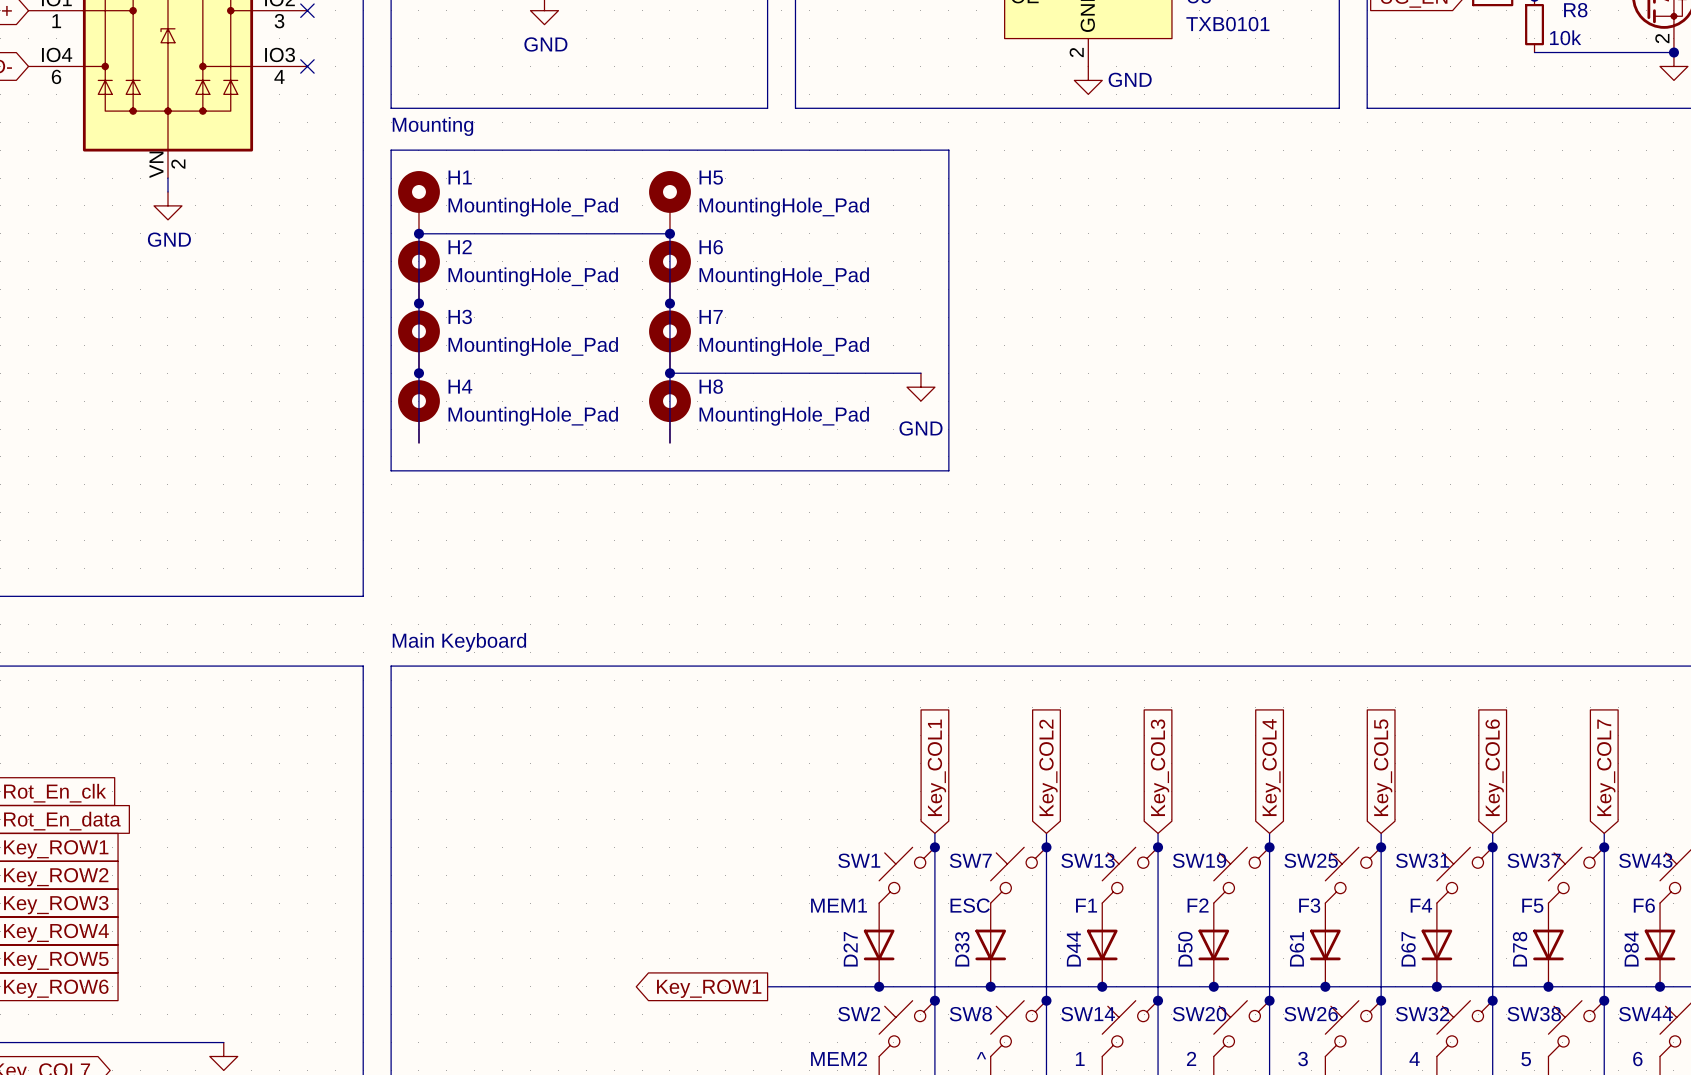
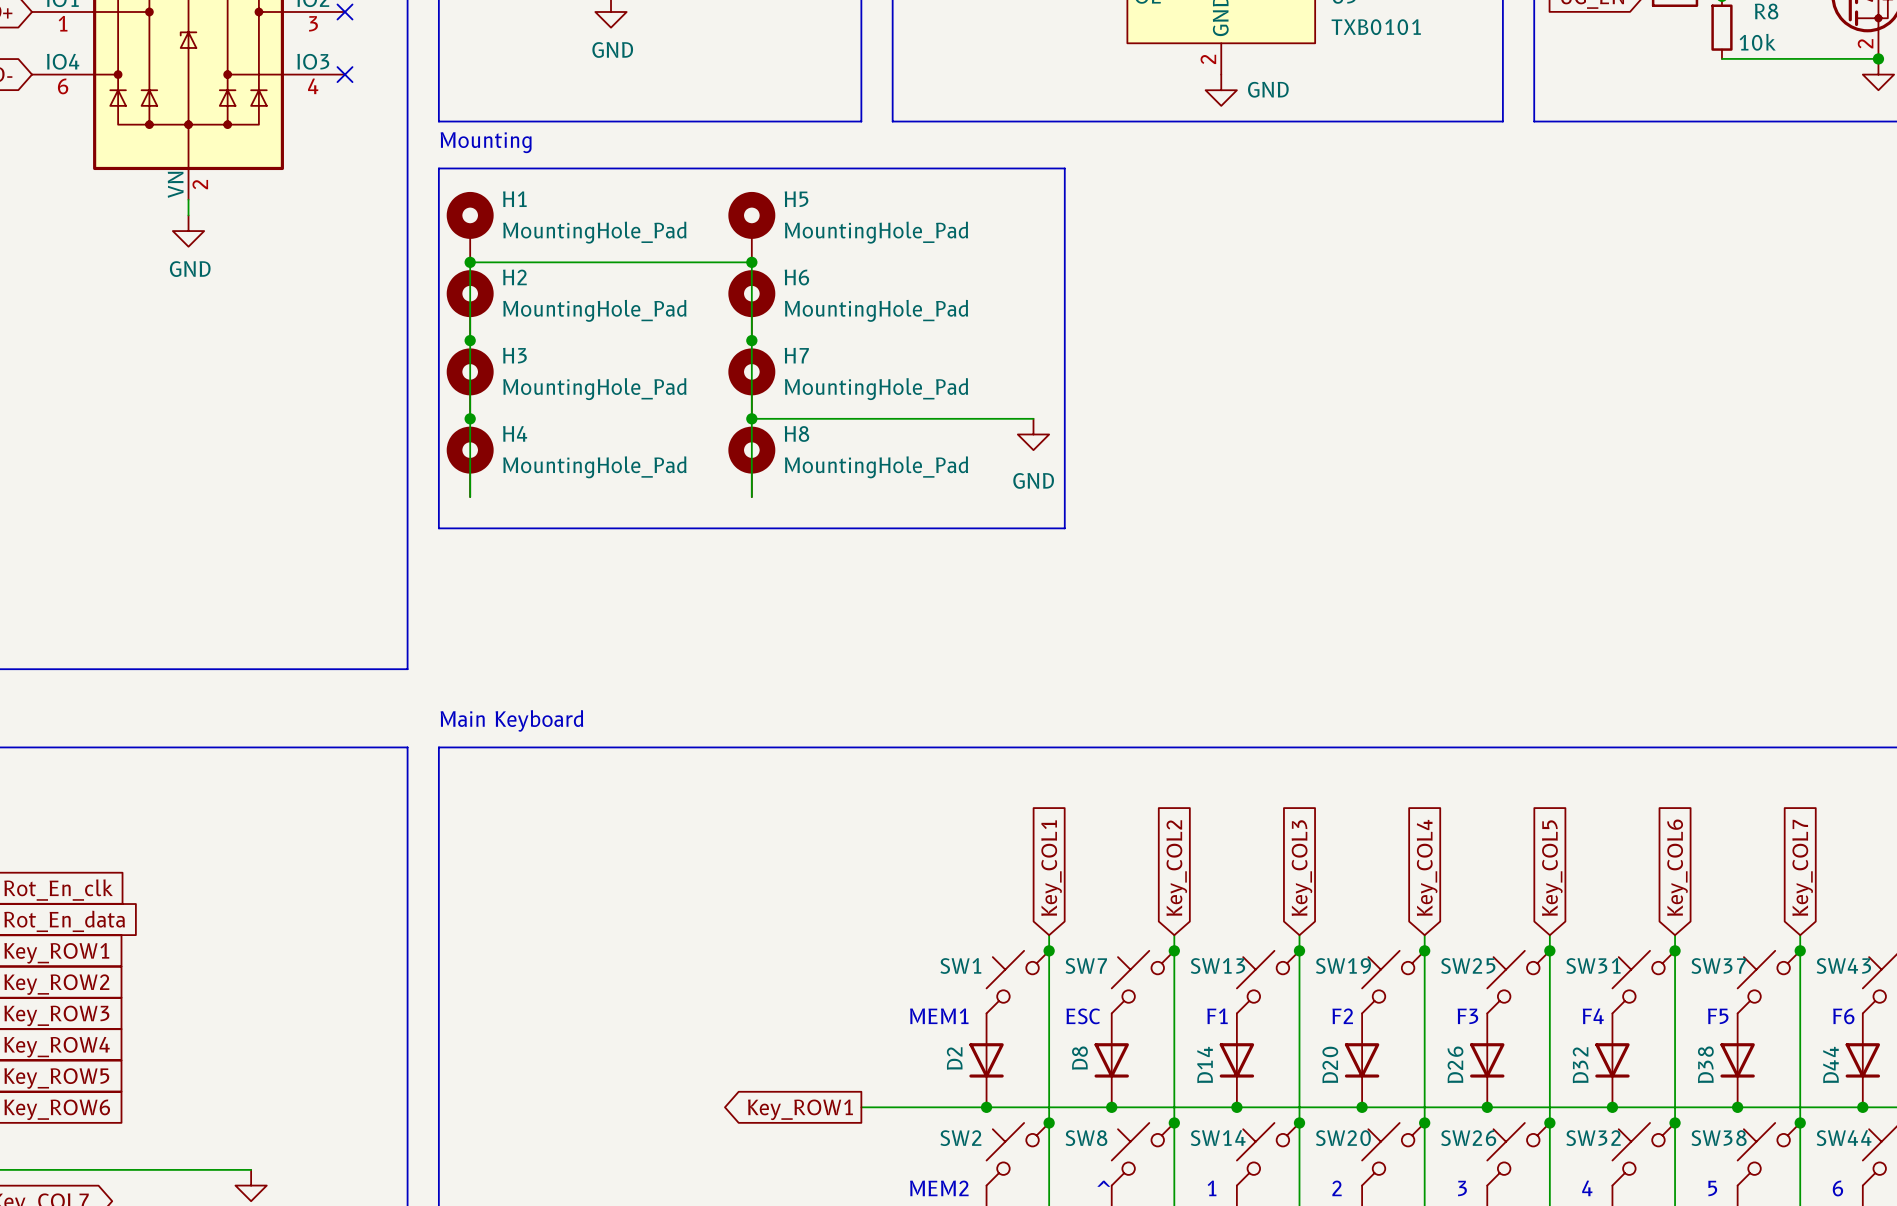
D27 name: D27 (850, 949) -> D2 (954, 1058)
D33 name: D33 (962, 949) -> D8 (1079, 1058)
D44 name: D44 (1073, 949) -> D14 (1205, 1064)
D50 name: D50 (1185, 949) -> D20 (1330, 1064)
D61 name: D61 (1296, 949) -> D26 (1455, 1064)
D67 name: D67 (1408, 949) -> D32 (1580, 1065)
D78 name: D78 (1520, 949) -> D38 (1705, 1064)
D84 name: D84 (1631, 949) -> D44 (1830, 1064)

